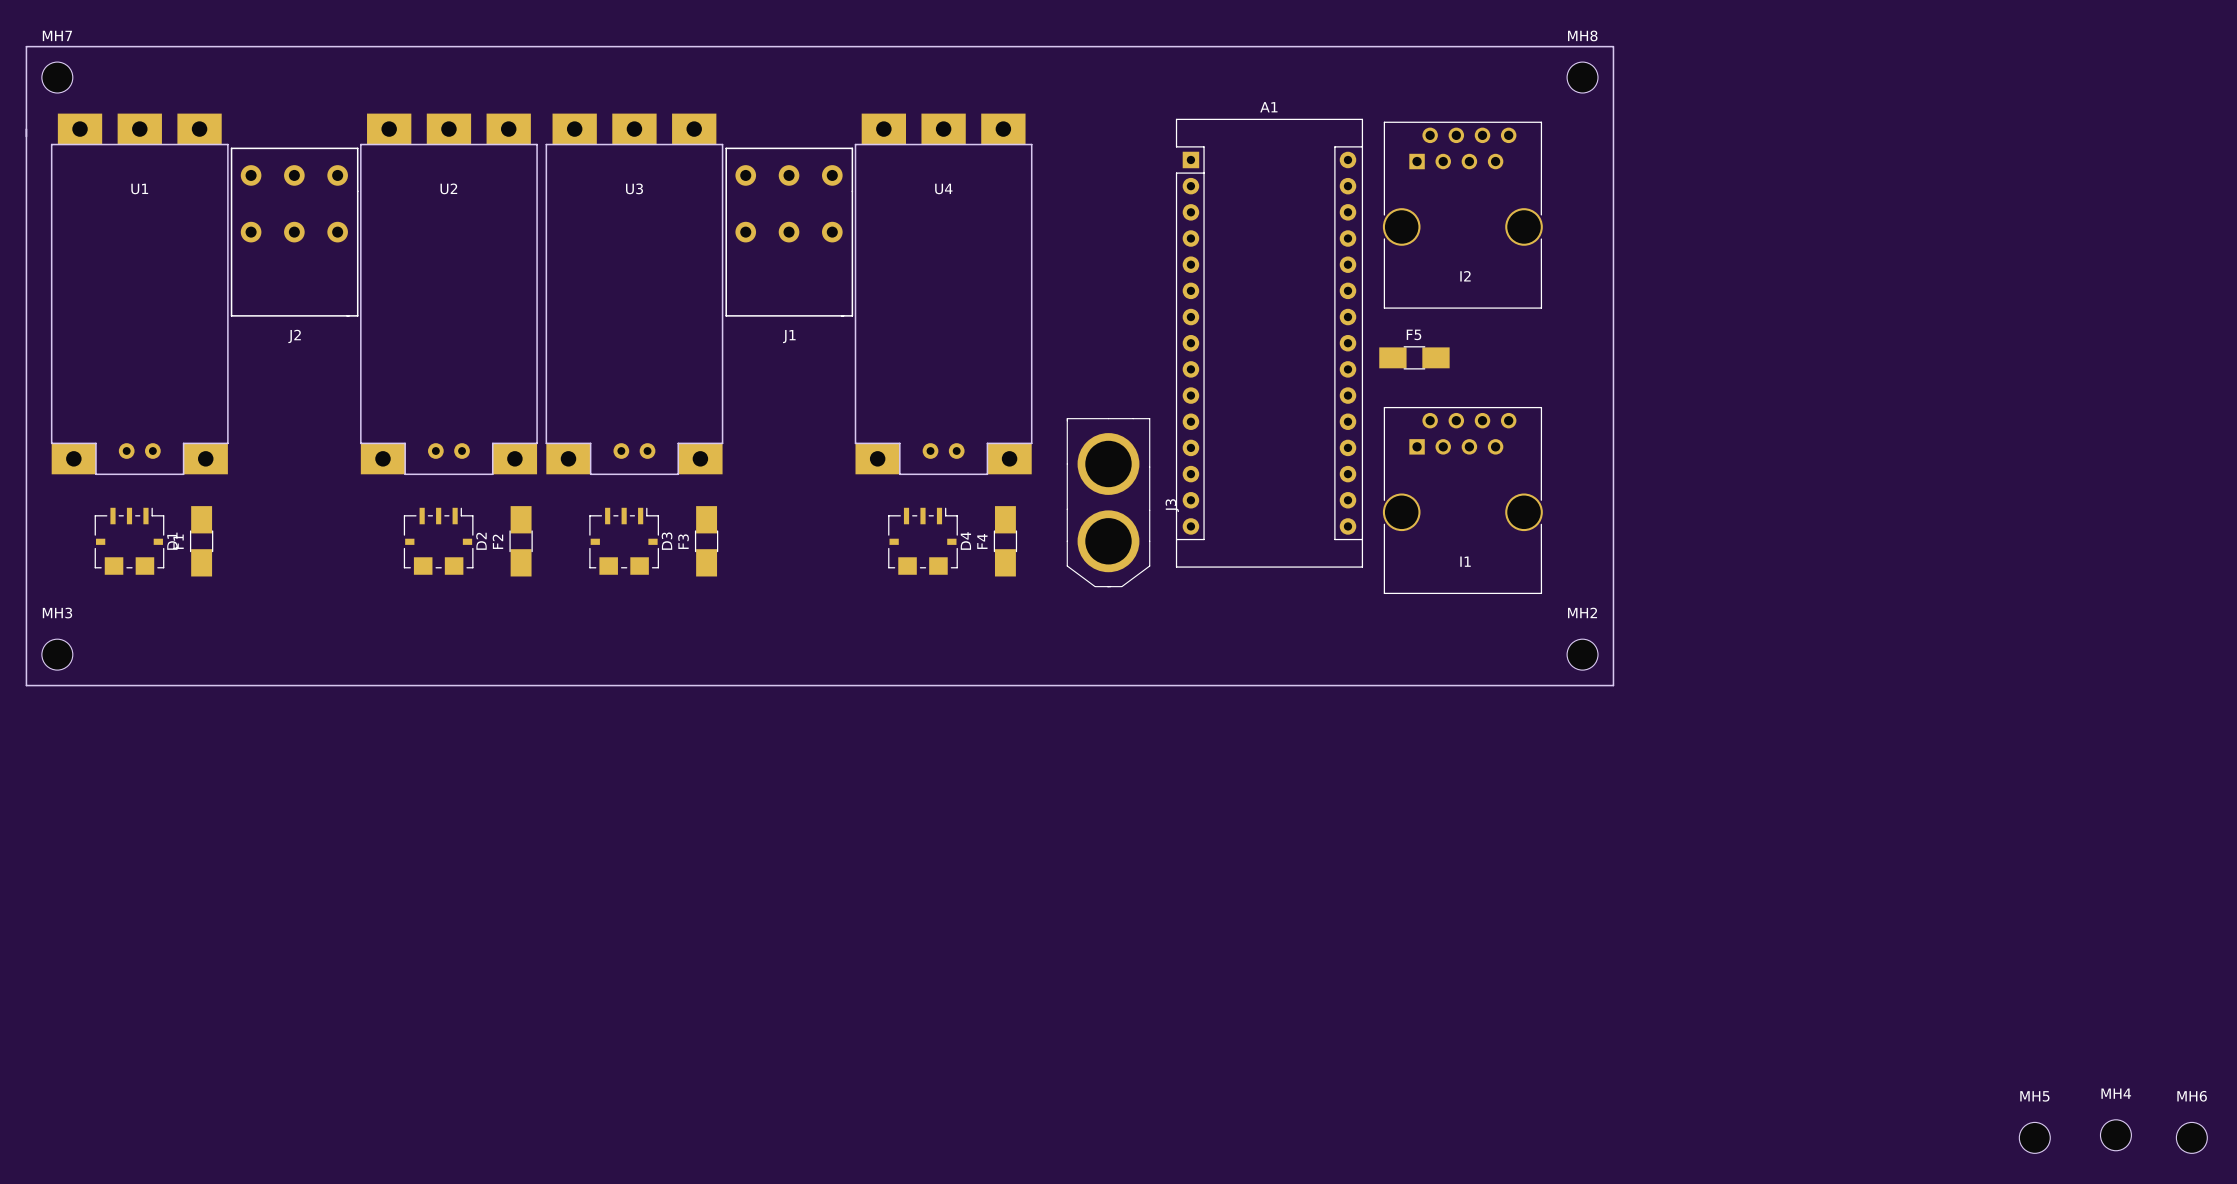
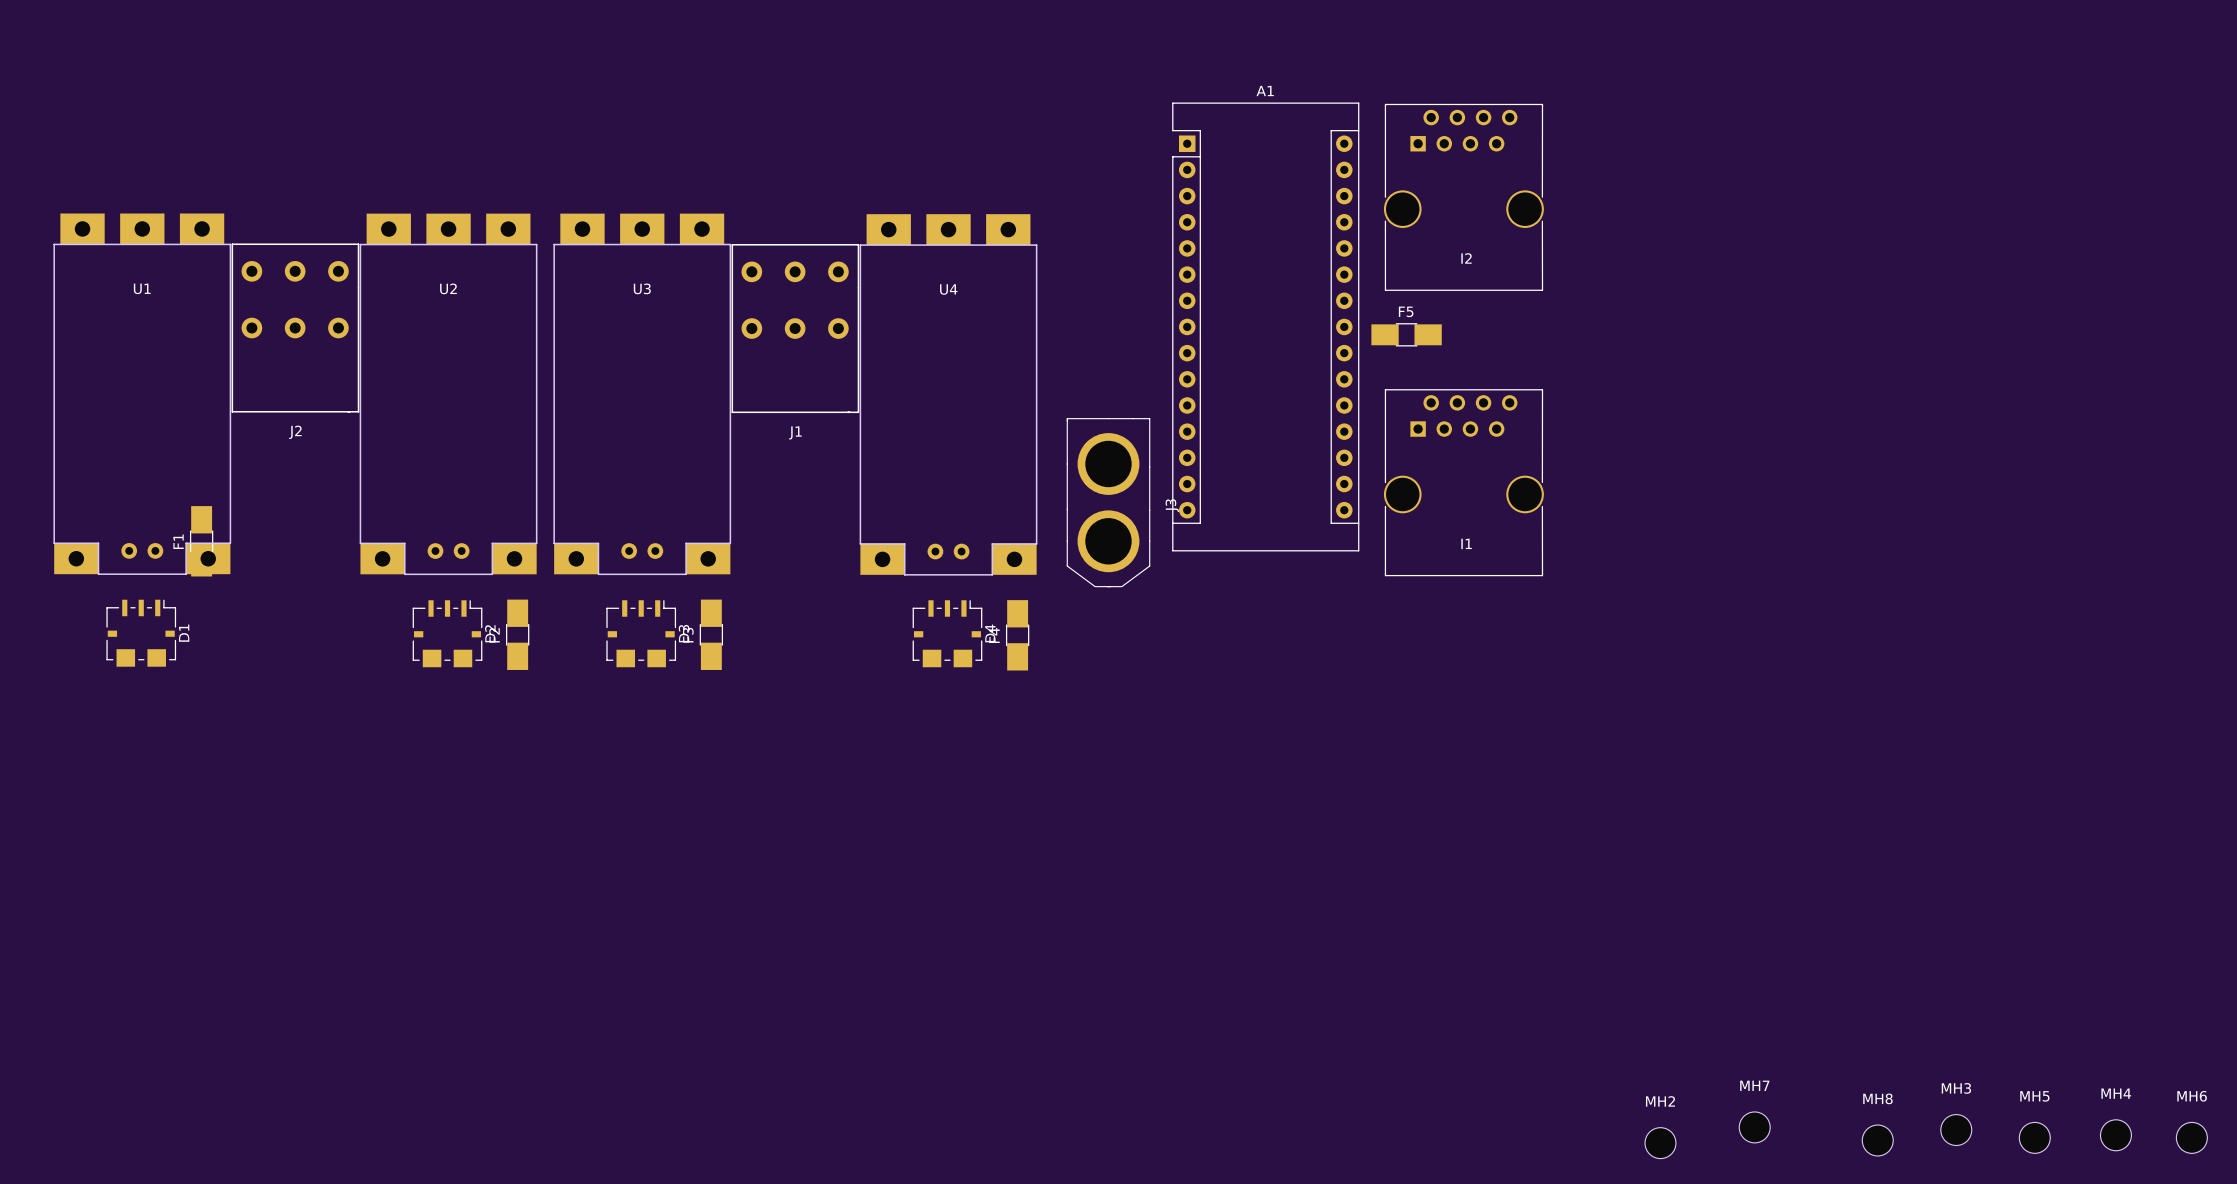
board edge: (1613, 46) (26, 46) (26, 685) (1613, 685) (1613, 46) -> none
MH7 position: (57, 77) -> (1754, 1127)
MH8 position: (1582, 77) -> (1877, 1140)
I2 position: (1462, 215) -> (1463, 197)
J2 position: (294, 232) -> (295, 328)
J1 position: (789, 232) -> (795, 328)
U1 position: (139, 294) -> (142, 394)
U2 position: (448, 294) -> (448, 394)
U3 position: (634, 294) -> (642, 394)
U4 position: (943, 294) -> (948, 394)
A1 position: (1269, 343) -> (1265, 326)
F5 position: (1414, 357) -> (1406, 334)
I1 position: (1462, 500) -> (1463, 482)
D1 position: (129, 541) -> (141, 633)
D2 position: (438, 541) -> (447, 633)
F2 position: (521, 541) -> (517, 634)
D3 position: (624, 541) -> (641, 633)
F3 position: (706, 541) -> (711, 634)
D4 position: (923, 541) -> (947, 633)
F4 position: (1005, 541) -> (1017, 635)
MH3 position: (57, 654) -> (1956, 1130)
MH2 position: (1582, 654) -> (1660, 1143)

